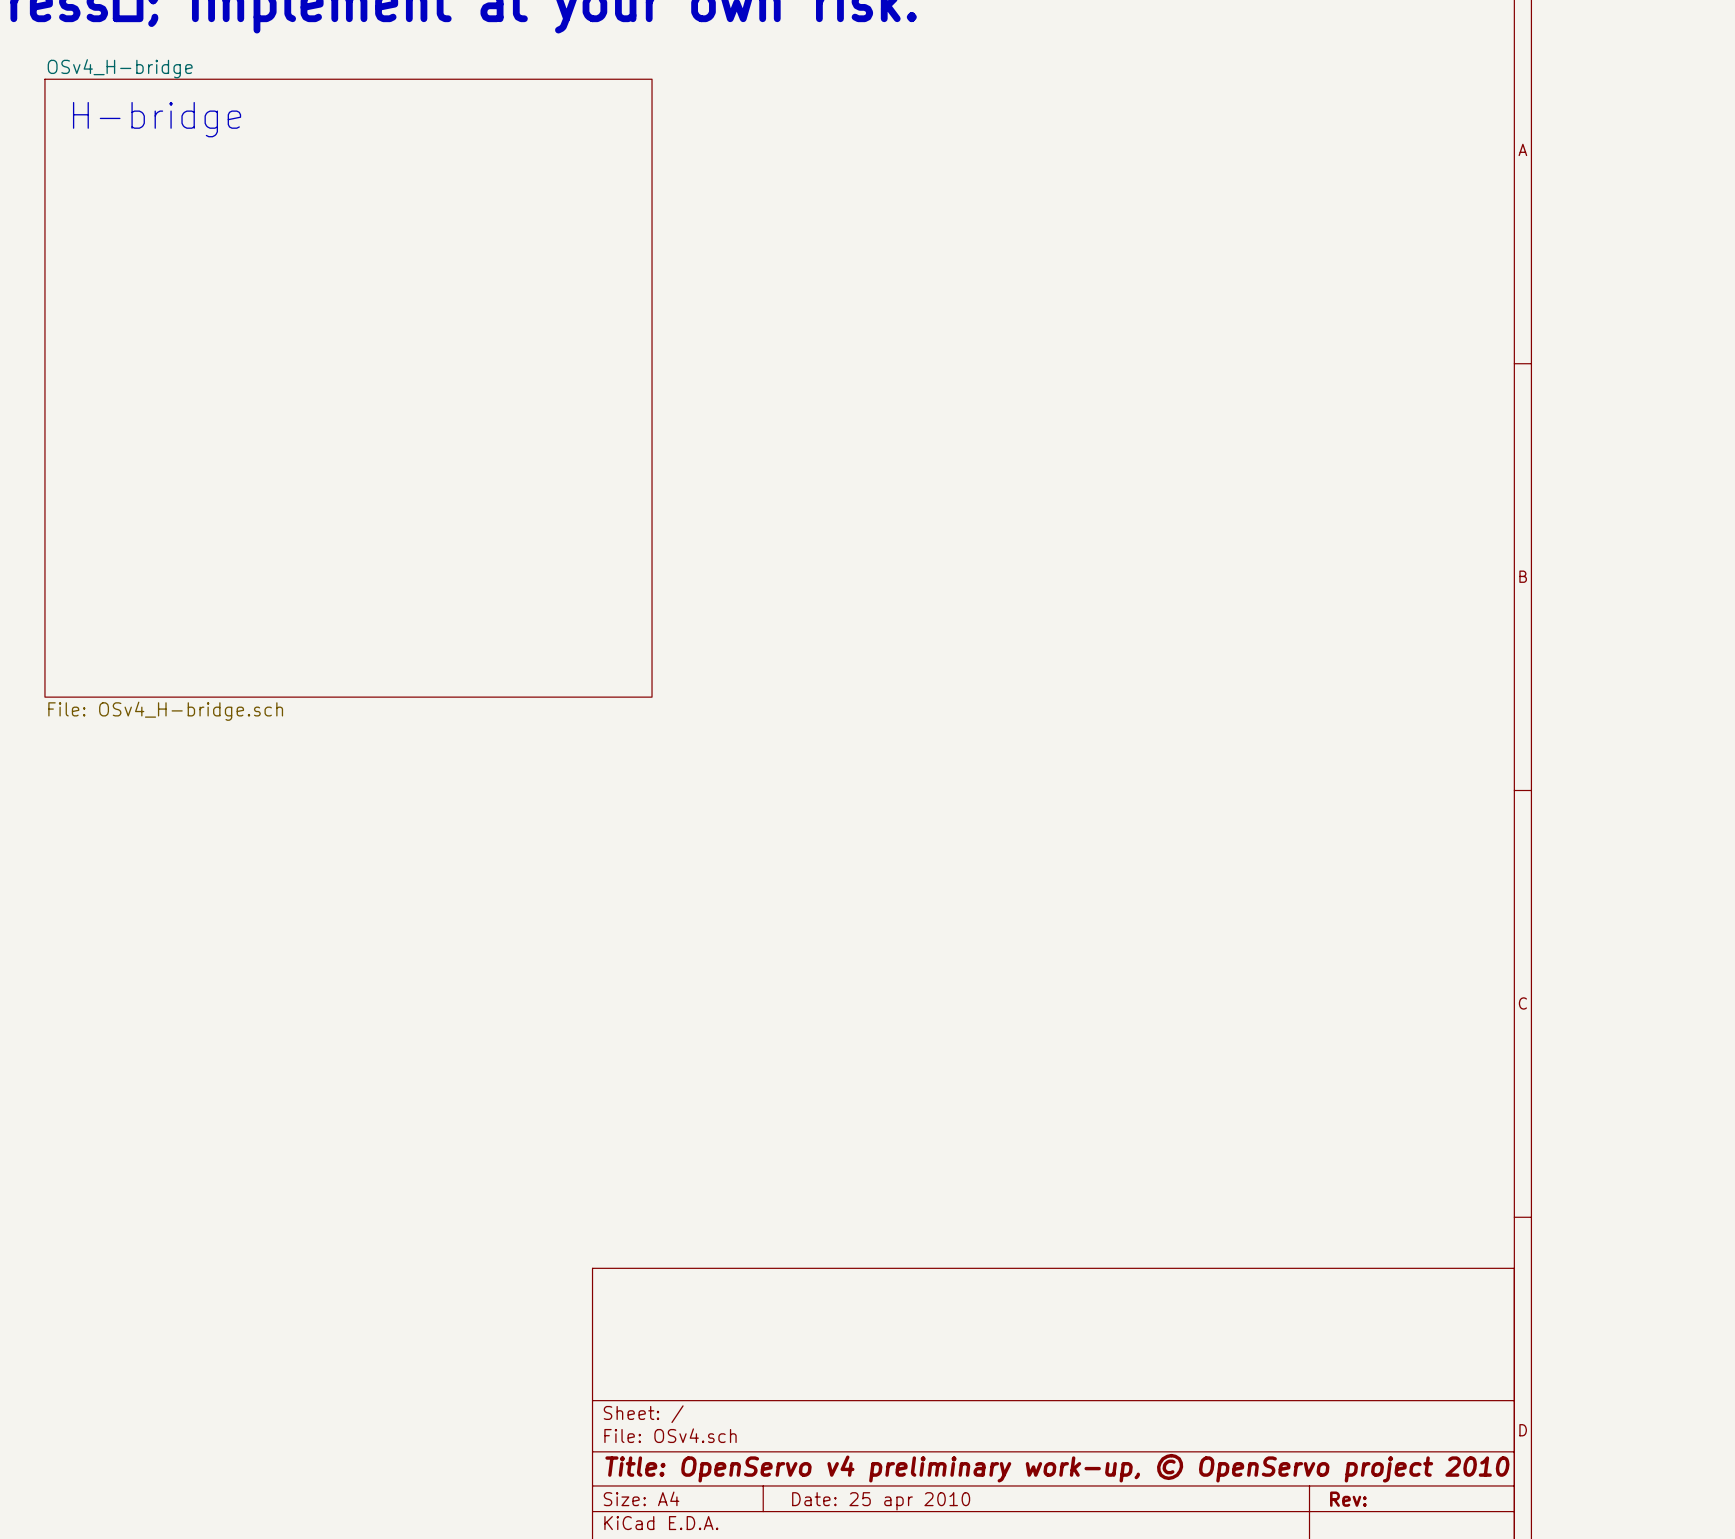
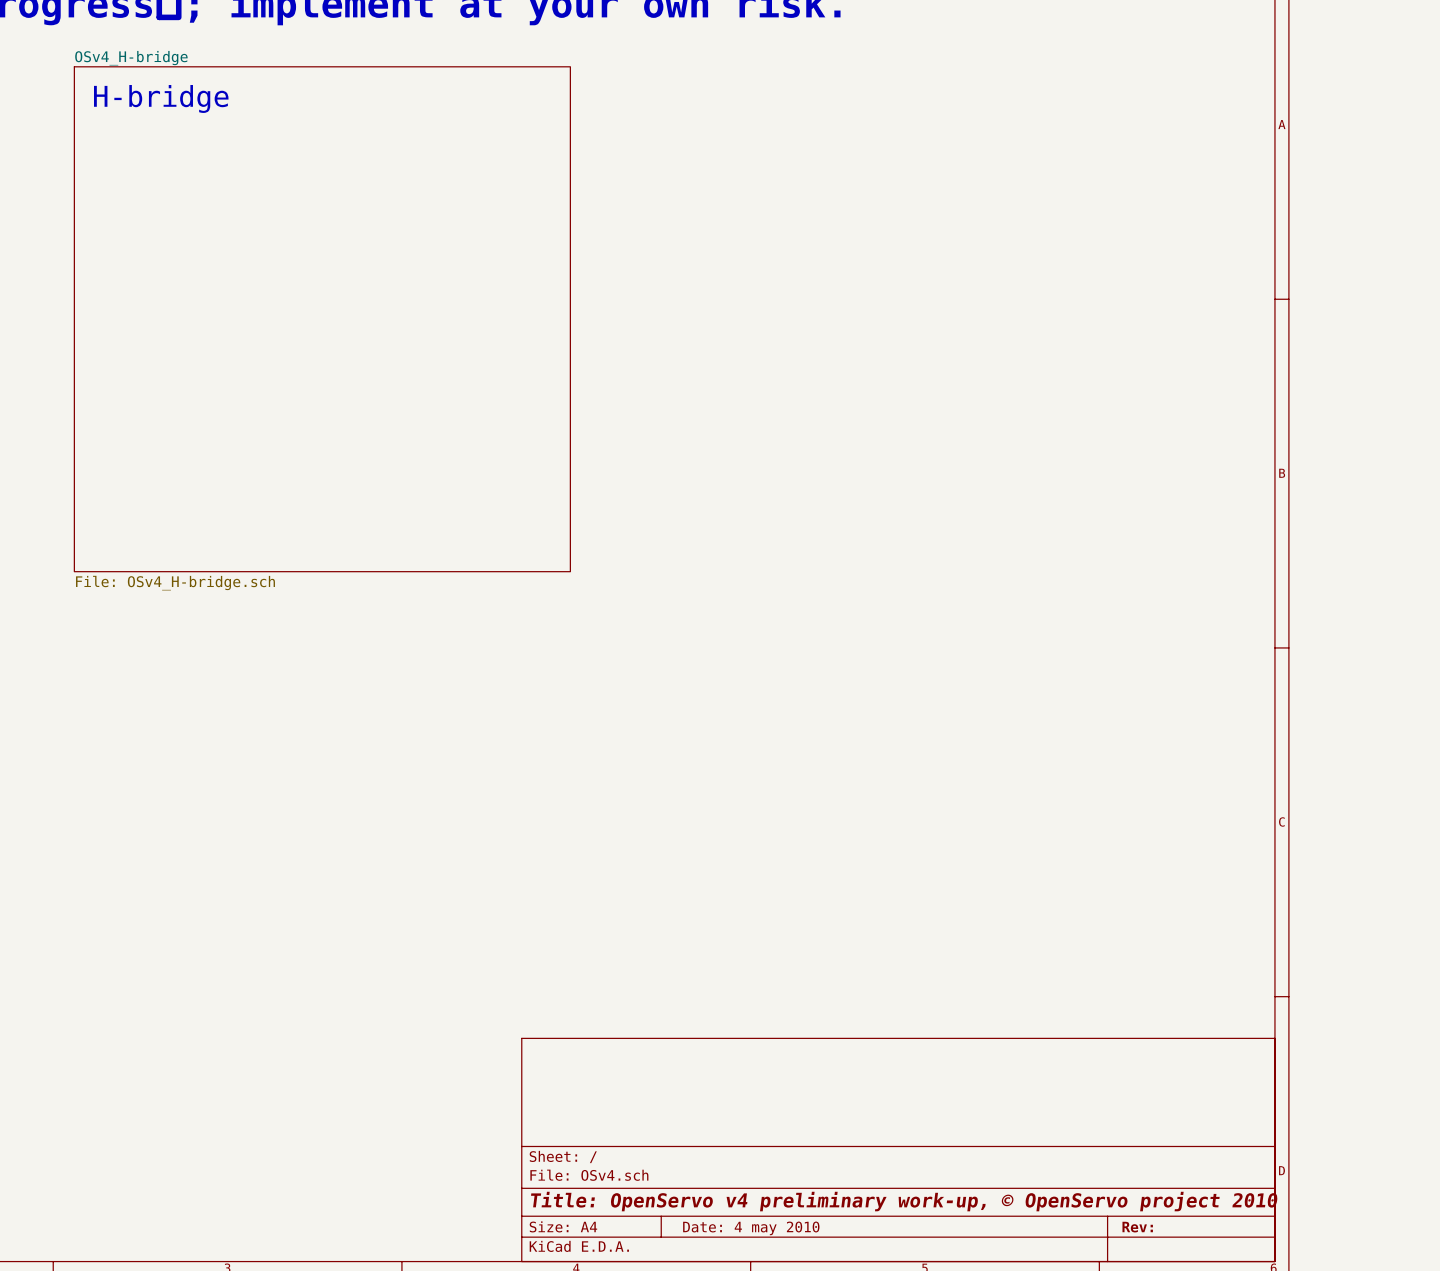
title block: Date: 25 apr 2010 (881, 1501) -> Date: 4 may 2010 (751, 1228)

